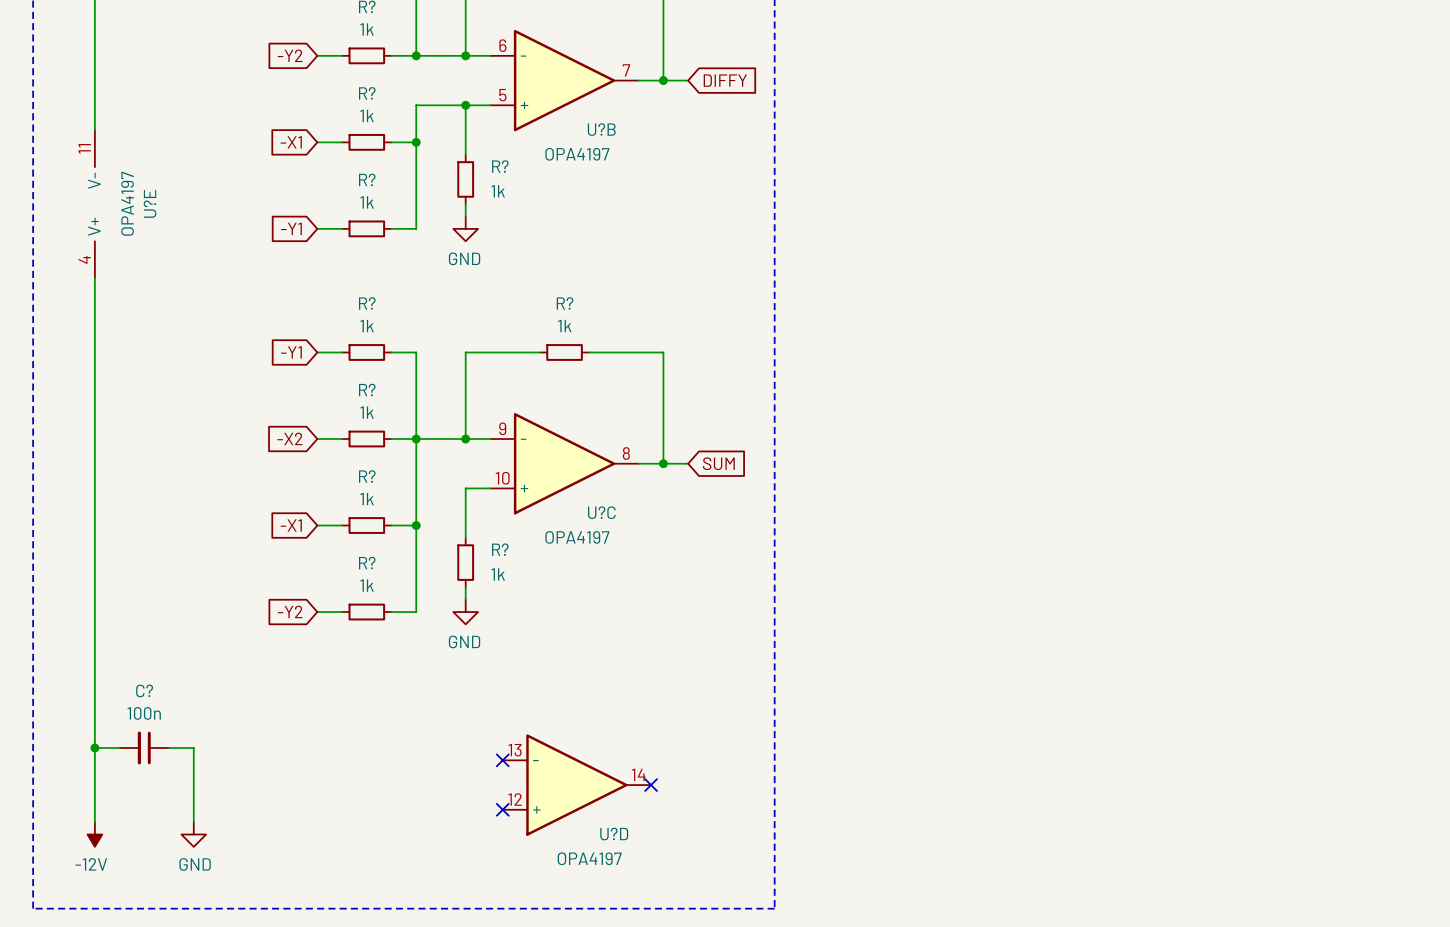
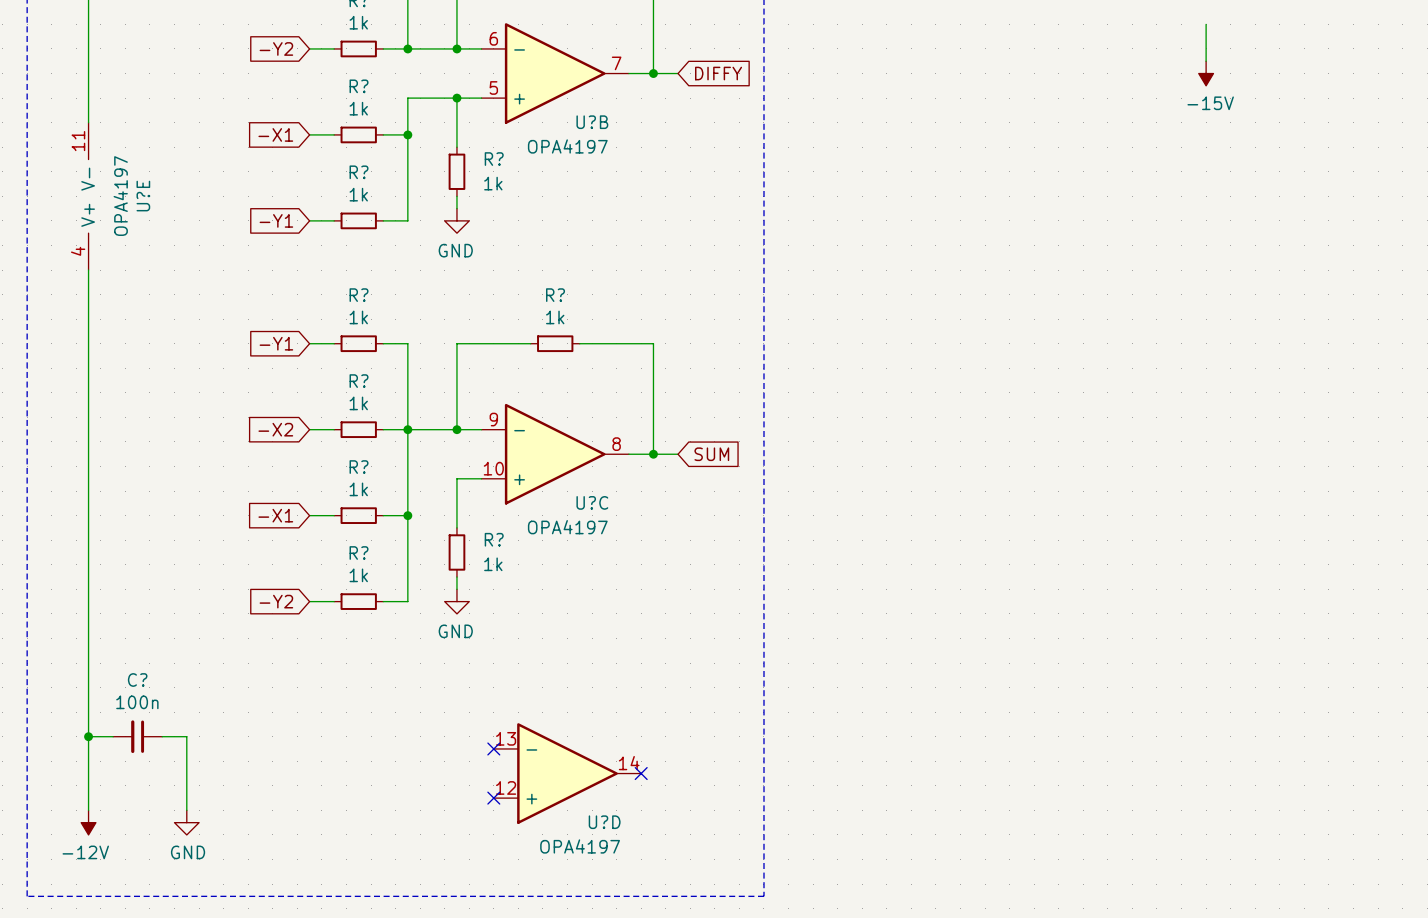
wire: none -> (1206, 24) (1206, 61)
power symbol: none -> -15V (1206, 73)

